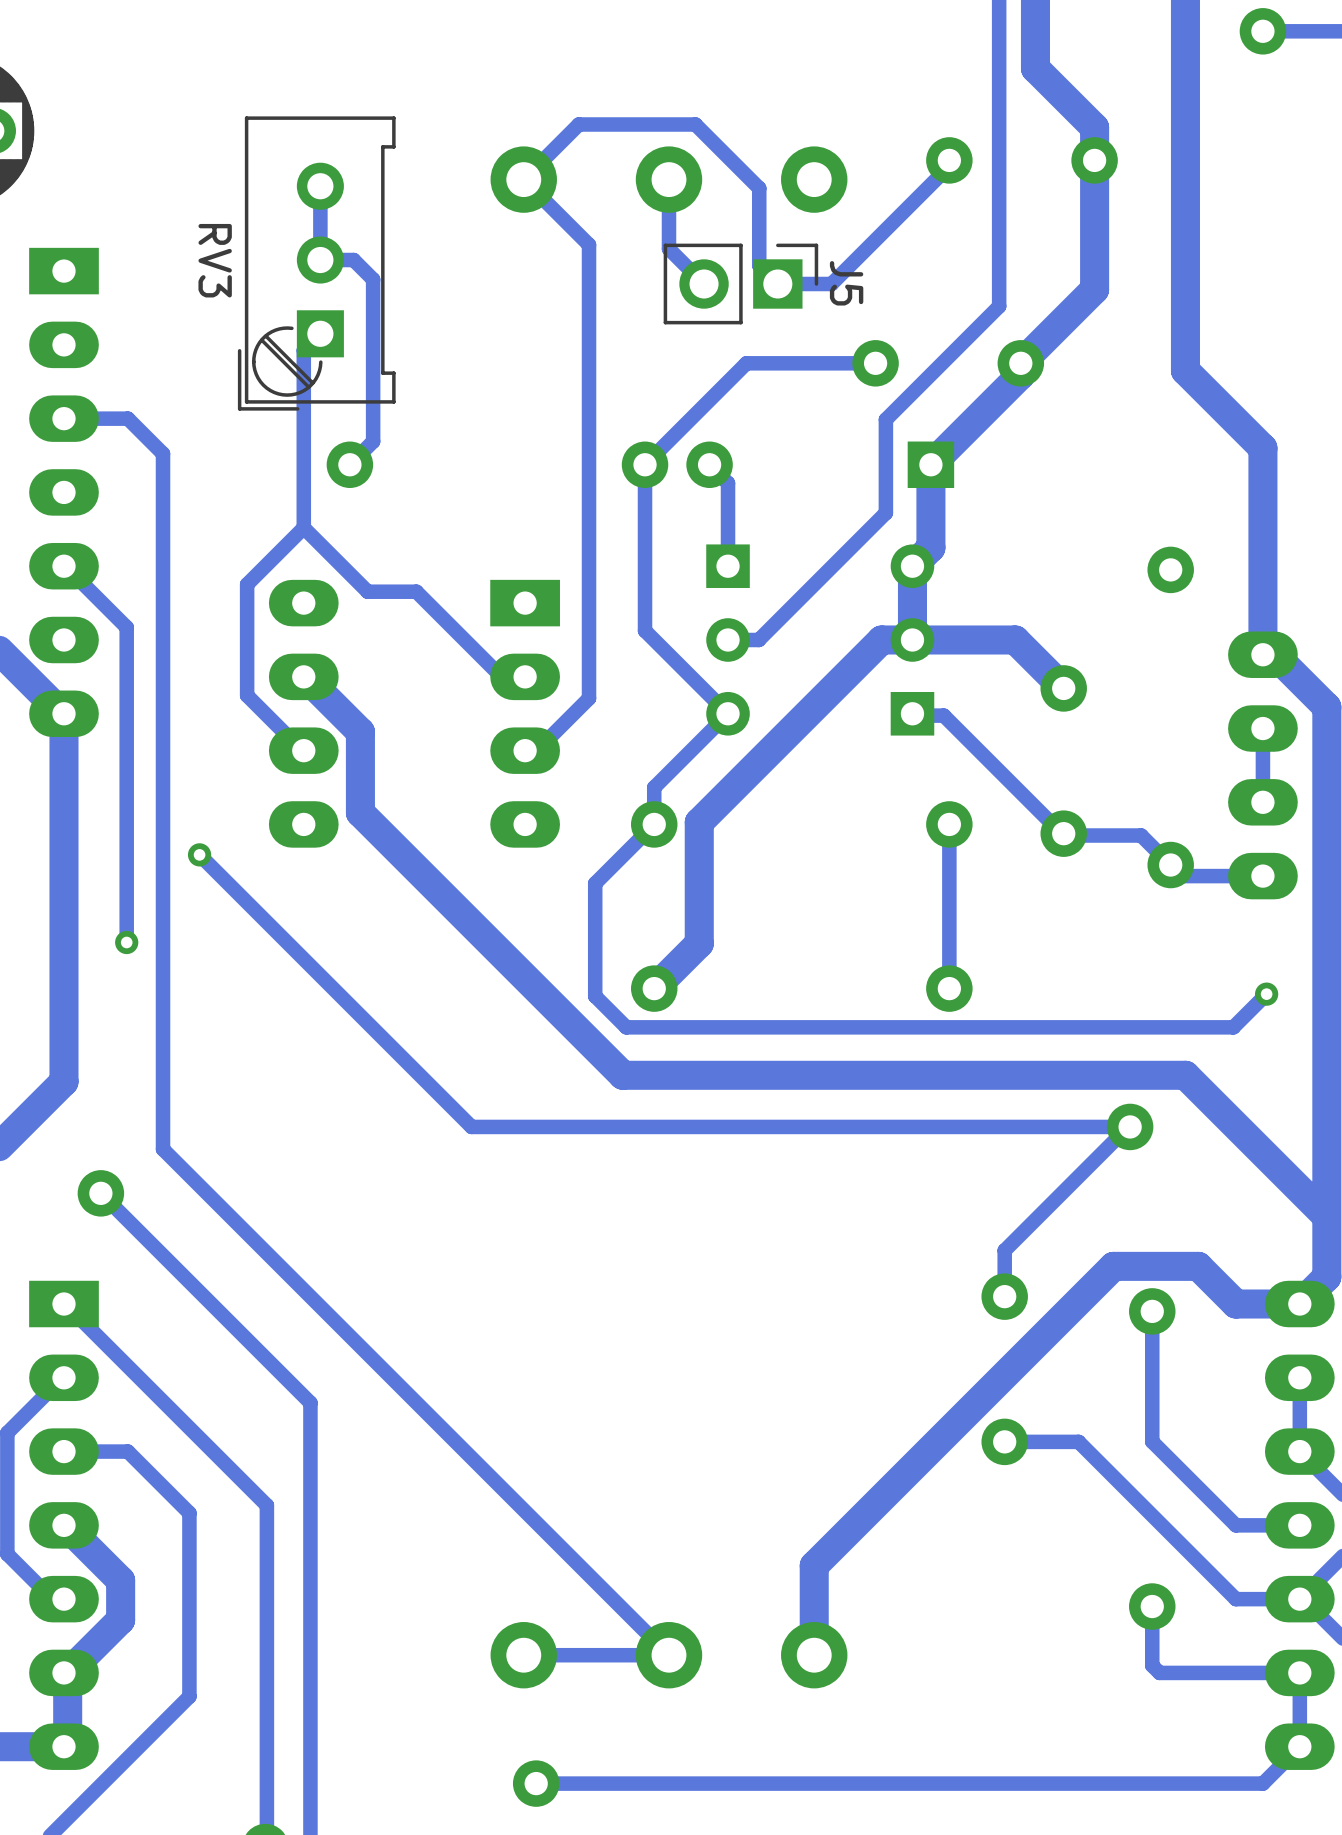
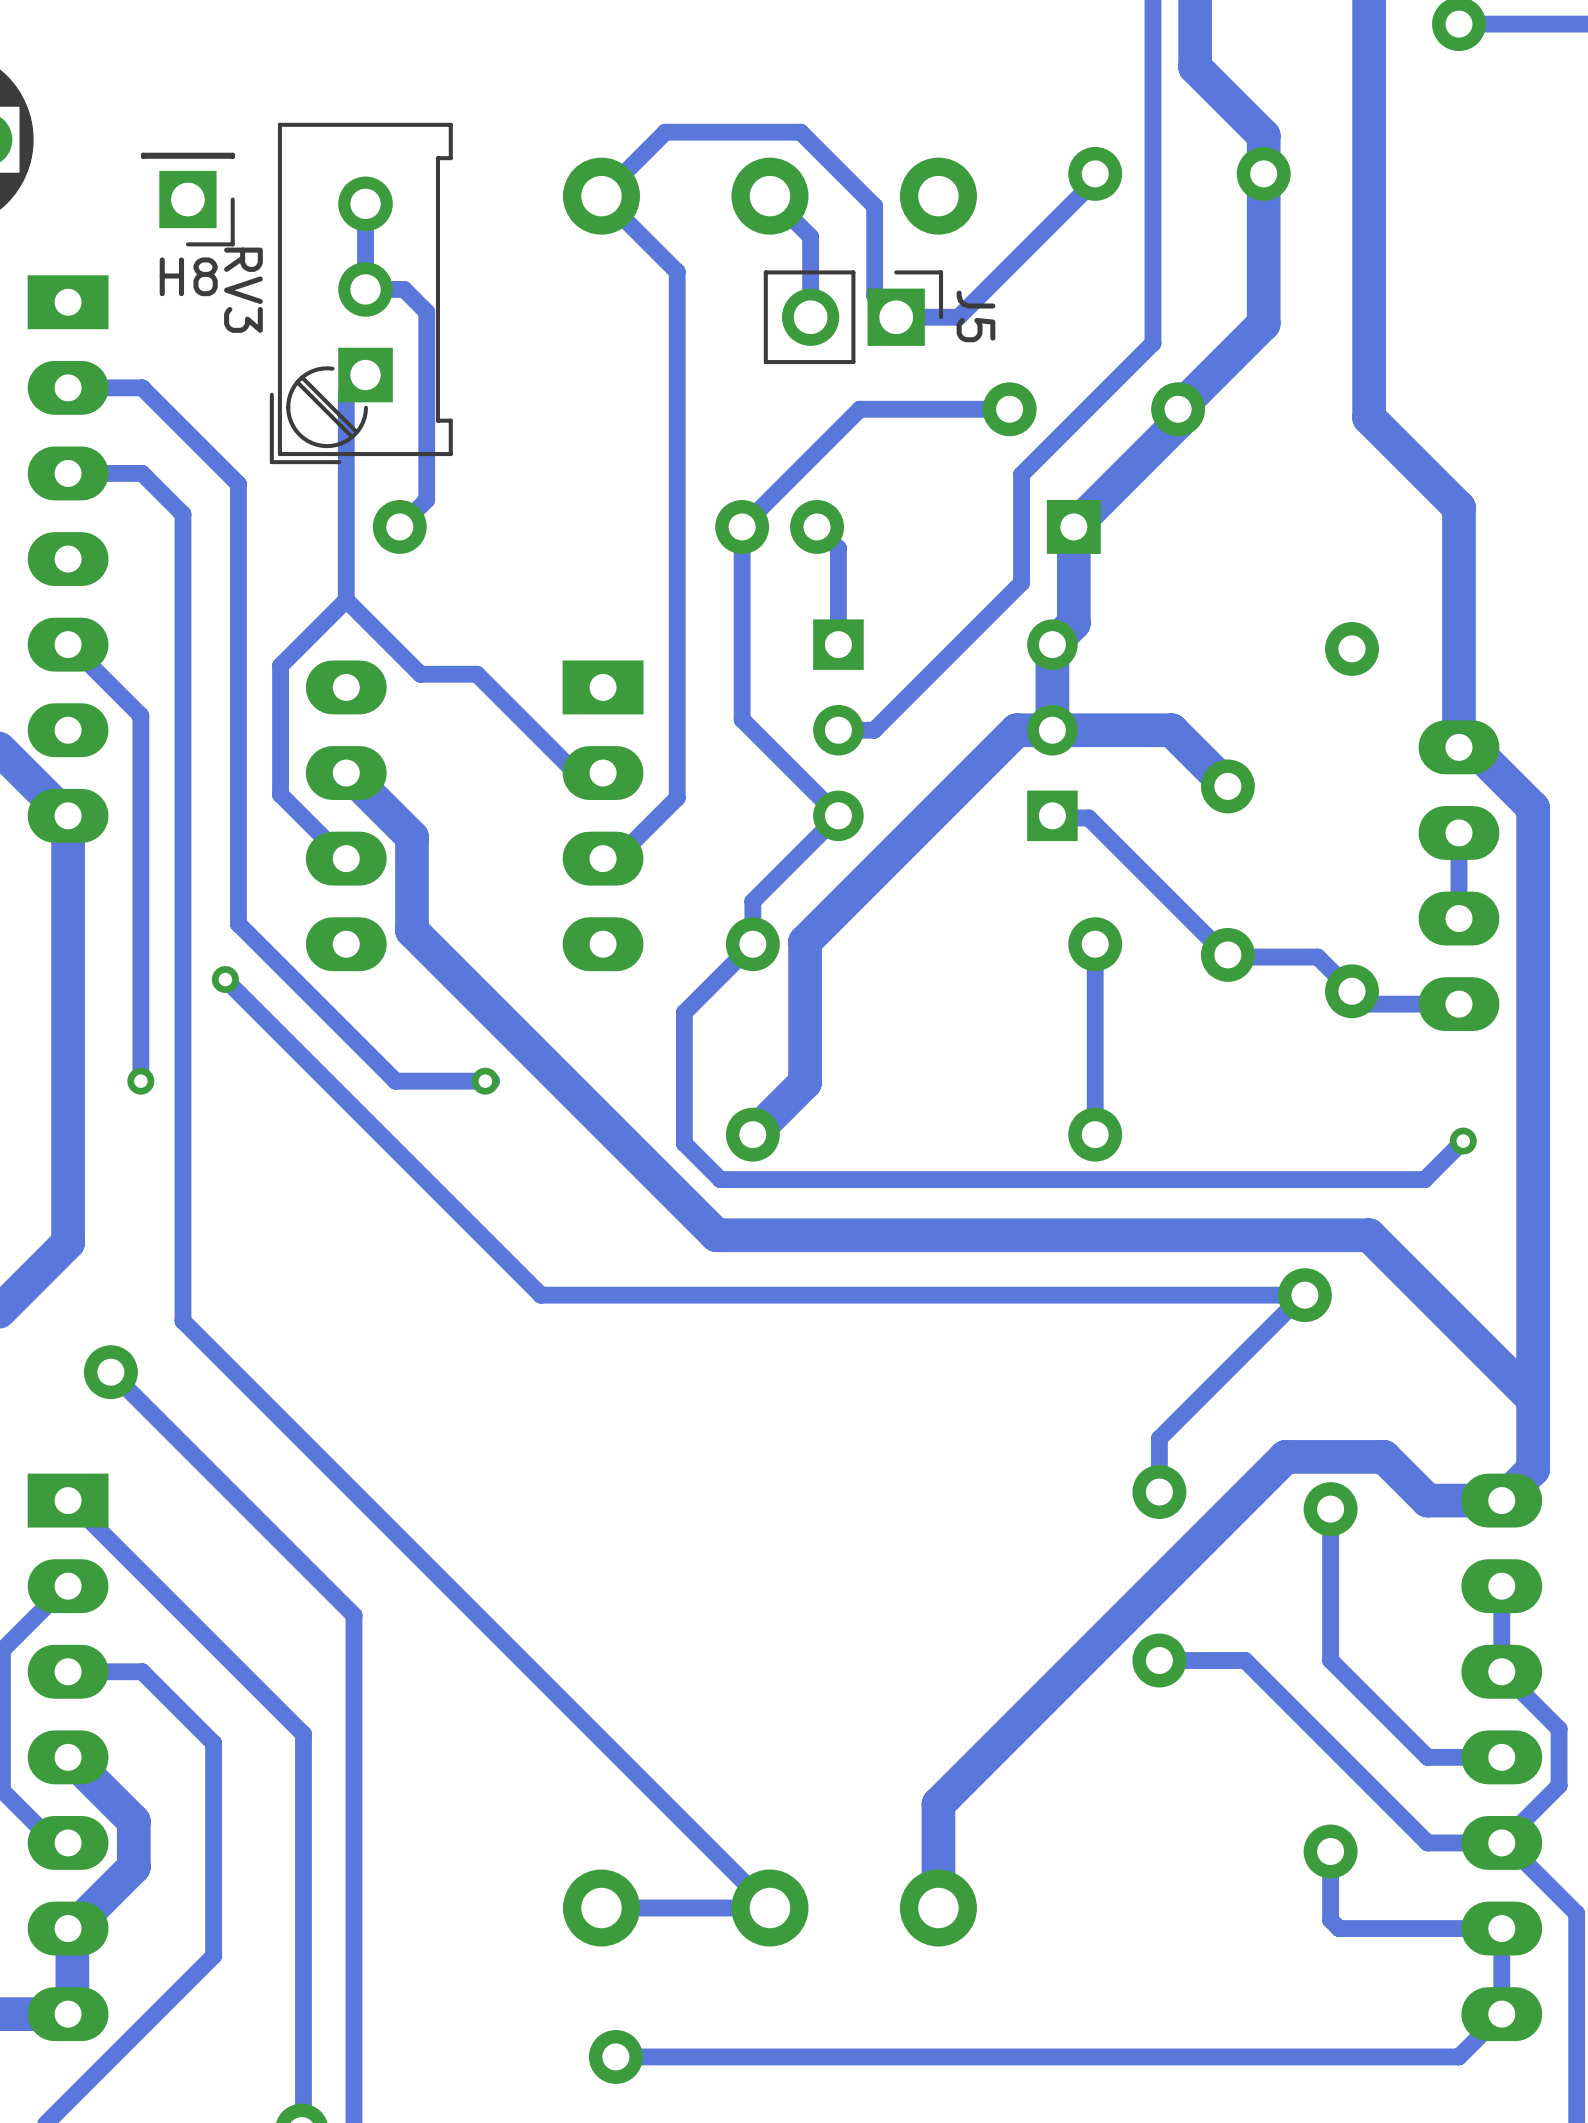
track: (668, 179) (668, 248) (704, 284) -> (769, 196) (810, 236) (810, 317)
H8: none -> (187, 199)
track: none -> (68, 387) (142, 387) (238, 484) (238, 923) (395, 1081) (491, 1081)
via: none -> (485, 1081)

